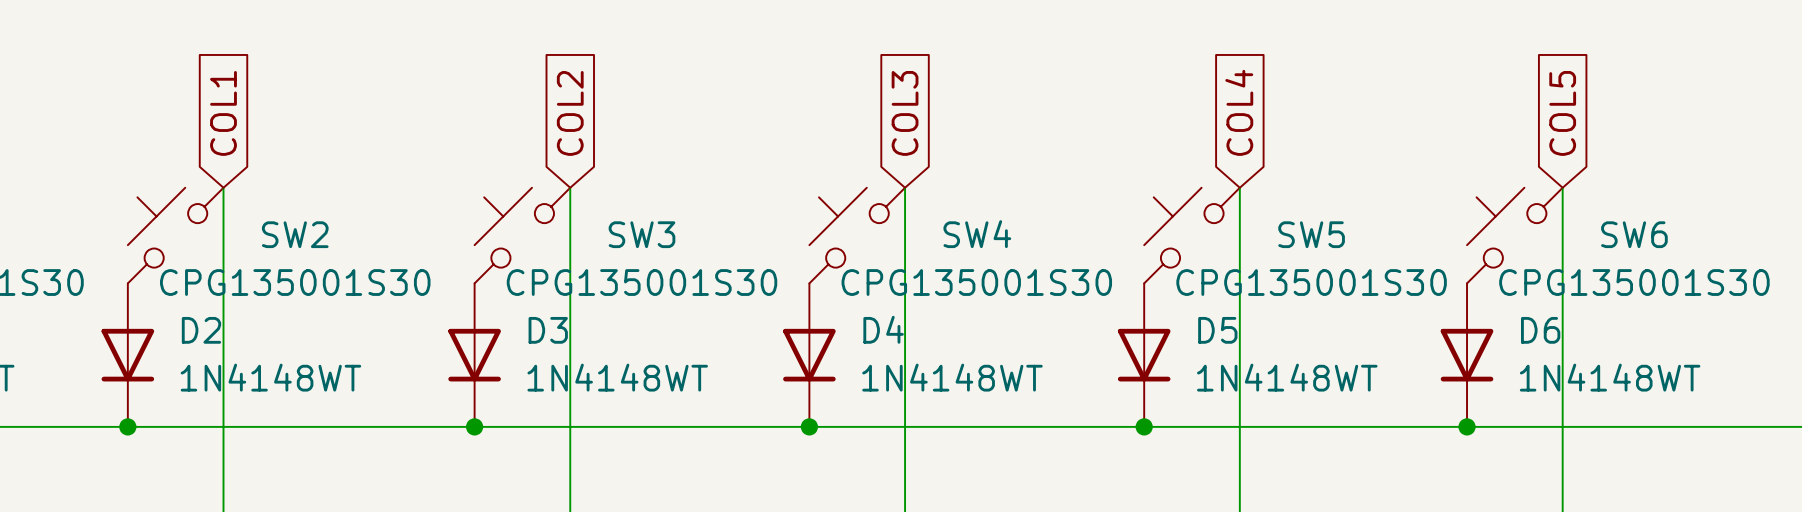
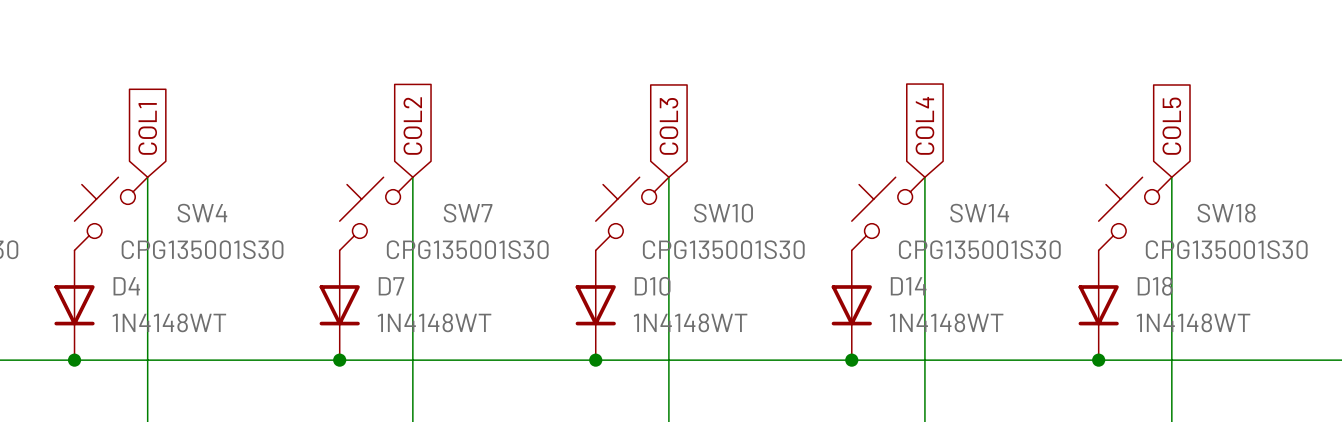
SW2 name: SW2 (295, 234) -> SW4 (202, 213)
SW3 name: SW3 (642, 234) -> SW7 (468, 213)
SW4 name: SW4 (977, 234) -> SW10 (723, 213)
SW5 name: SW5 (1311, 234) -> SW14 (979, 213)
SW6 name: SW6 (1634, 234) -> SW18 (1226, 213)
D4 name: D4 (883, 329) -> D10 (652, 286)
D2 name: D2 (201, 330) -> D4 (126, 286)
D3 name: D3 (548, 330) -> D7 (391, 286)
D5 name: D5 (1217, 330) -> D14 (908, 286)
D6 name: D6 (1540, 330) -> D18 (1155, 286)

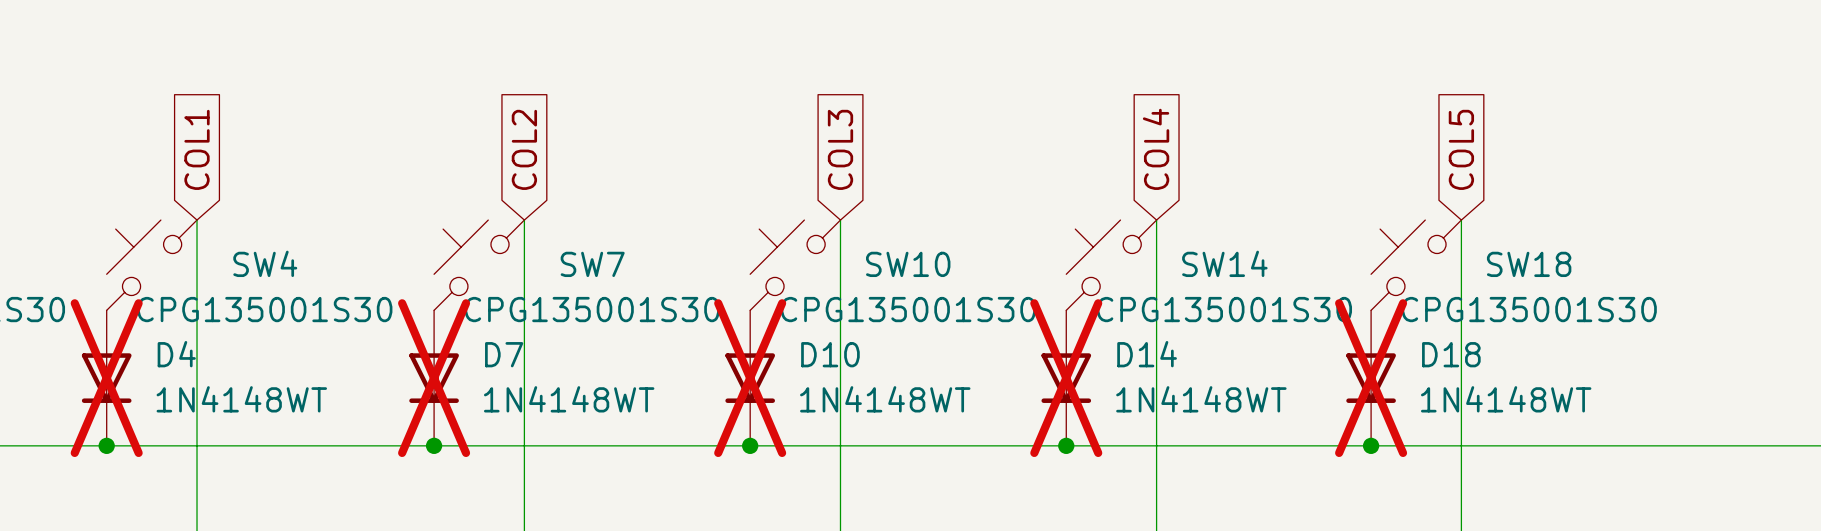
D4 do-not-place cross: none -> (106, 378)
D7 do-not-place cross: none -> (434, 378)
D10 do-not-place cross: none -> (750, 378)
D14 do-not-place cross: none -> (1066, 378)
D18 do-not-place cross: none -> (1371, 378)

